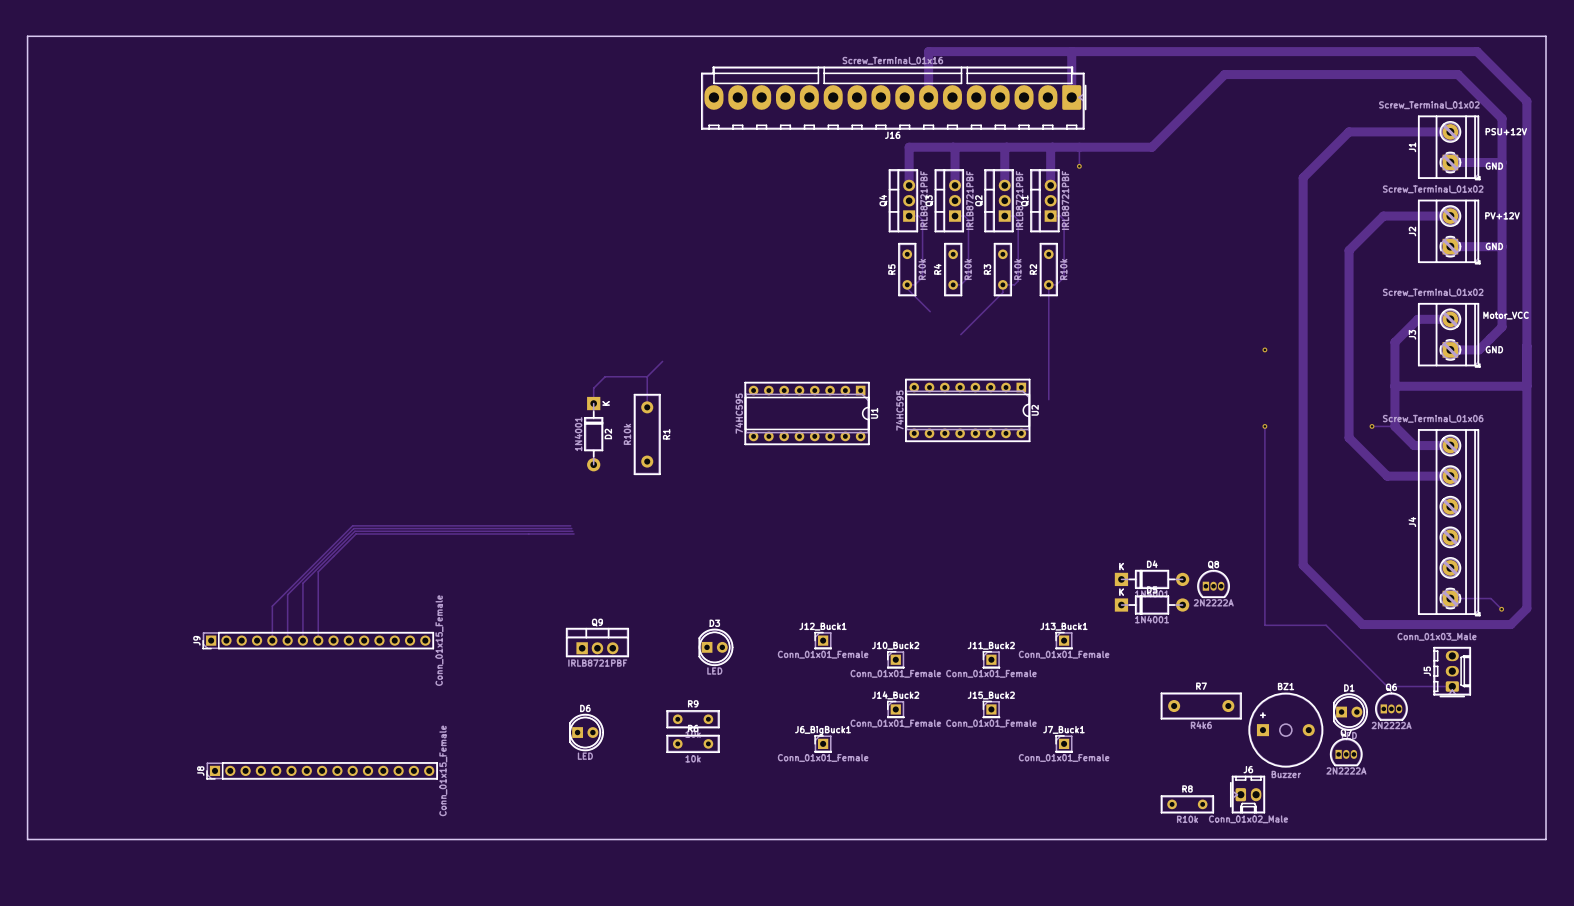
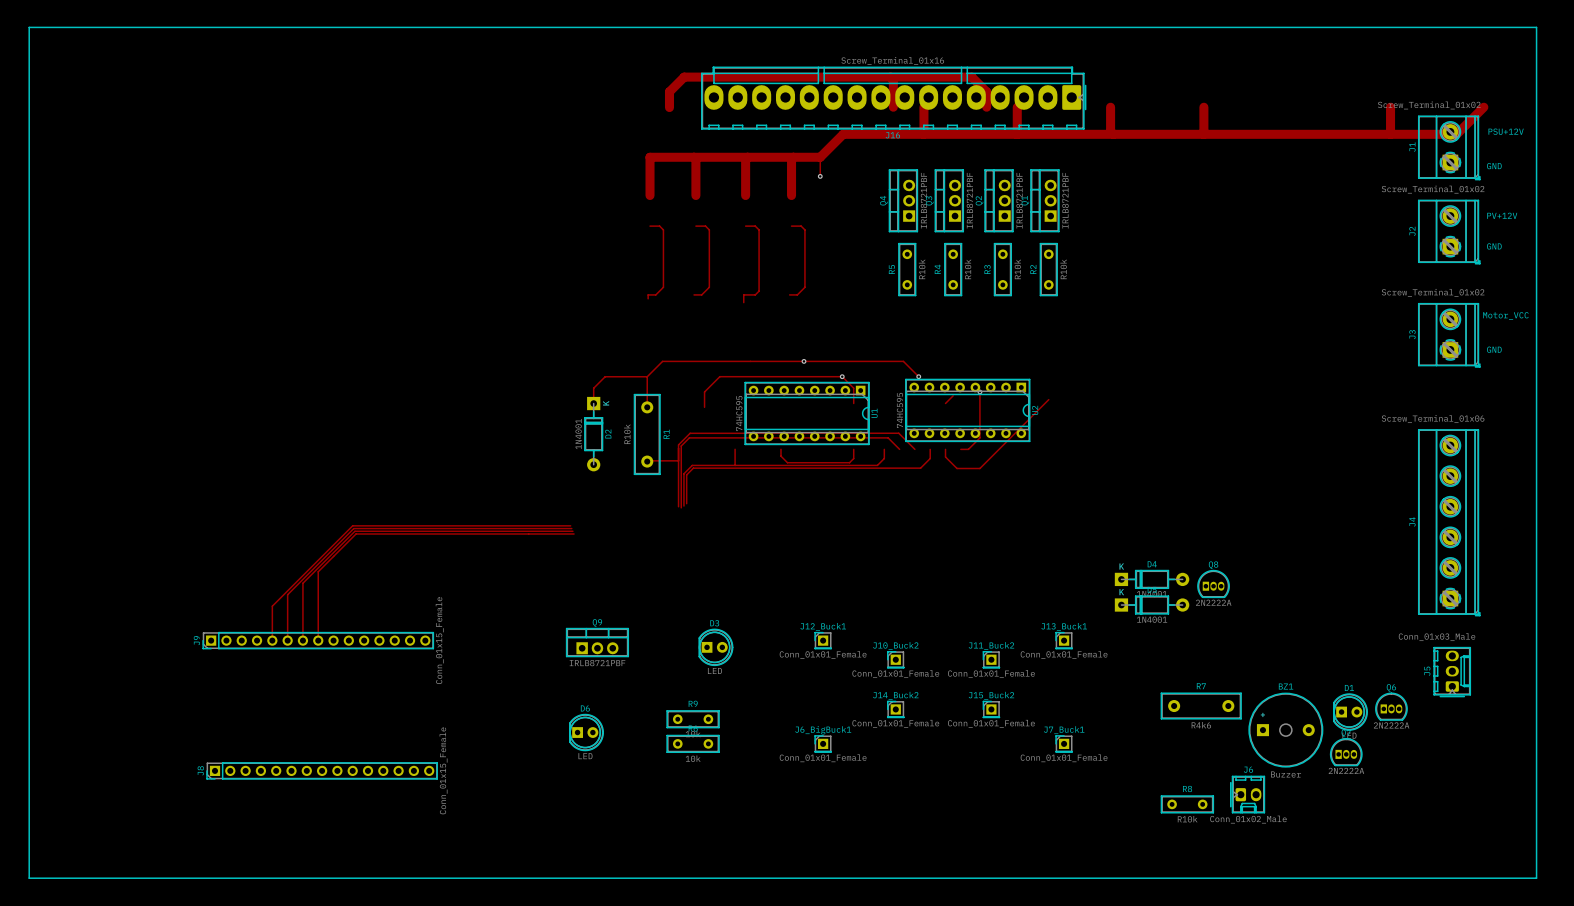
line: none -> (29, 27) (1536, 27) (1536, 878) (29, 878) (29, 27)
board edge: (27, 36) (1546, 36) (1546, 839) (27, 839) (27, 36) -> none
track: (1071, 51) (1071, 97) -> none
track: none -> (890, 77) (893, 79) (893, 107)
track: (928, 97) (928, 51) (1477, 51) (1526, 101) (1526, 608) (1510, 624) (1362, 624) (1303, 565) (1303, 177) (1349, 131) (1450, 131) -> none
track: none -> (923, 107) (923, 134)
track: none -> (986, 107) (986, 91) (971, 77) (684, 77) (669, 91) (669, 107)
track: none -> (1017, 107) (1017, 134)
track: none -> (1110, 107) (1110, 131) (1113, 134)
track: none -> (1203, 107) (1203, 134)
track: none -> (1390, 107) (1390, 134)
track: none -> (1483, 107) (1456, 134) (843, 134) (820, 157)
track: (953, 147) (955, 149) (955, 185) -> none
track: (1006, 147) (1004, 149) (1004, 185) -> none
track: (1052, 147) (1050, 149) (1050, 185) -> none
track: (1079, 147) (1079, 166) -> none
track: none -> (694, 157) (695, 159) (695, 195)
track: none -> (747, 157) (745, 159) (745, 195)
track: none -> (793, 157) (791, 159) (791, 195)
track: none -> (820, 157) (650, 157) (650, 195)
track: none -> (820, 157) (820, 176)
track: (1450, 162) (1502, 162) -> none
via: (1079, 166) -> none
via: none -> (820, 176)
track: (909, 185) (909, 147) (1152, 147) (1224, 74) (1458, 74) (1502, 118) (1502, 326) (1479, 349) (1450, 349) -> none
track: (909, 216) (918, 216) (922, 219) (922, 277) (914, 284) (907, 284) (907, 288) (930, 311) -> none
track: (955, 216) (964, 216) (968, 219) (968, 277) (960, 284) (953, 284) -> none
track: (1004, 216) (1014, 216) (1018, 219) (1018, 281) (1014, 284) (1002, 284) (1002, 292) (960, 334) -> none
track: (1050, 216) (1060, 216) (1064, 219) (1064, 277) (1056, 284) (1048, 284) (1048, 399) -> (945, 449) (945, 457) (956, 468) (979, 468) (1048, 399)
track: (1450, 216) (1383, 216) (1349, 250) (1349, 437) (1387, 476) (1450, 476) -> none
track: none -> (650, 226) (659, 226) (663, 229) (663, 287) (655, 294) (648, 294) (648, 298)
track: none -> (695, 226) (705, 226) (709, 229) (709, 287) (701, 294) (694, 294)
track: none -> (745, 226) (755, 226) (759, 229) (759, 291) (755, 294) (743, 294) (743, 302)
track: none -> (791, 226) (801, 226) (804, 229) (804, 287) (797, 294) (789, 294)
track: (1450, 246) (1502, 246) -> none
track: (1450, 319) (1417, 319) (1394, 342) (1394, 426) -> none
via: (1264, 349) -> none
track: none -> (662, 361) (903, 361) (918, 376)
via: none -> (803, 361)
via: none -> (842, 376)
via: none -> (918, 376)
track: (1394, 386) (1526, 386) -> none
track: none -> (979, 392) (979, 437) (968, 449) (960, 449)
via: none -> (979, 392)
track: none -> (953, 395) (945, 403)
track: none -> (853, 403) (853, 388) (842, 376) (719, 376) (704, 392) (704, 407)
track: (1264, 426) (1264, 625) (1326, 625) (1387, 686) (1452, 686) -> none
via: (1264, 426) -> none
track: (1371, 426) (1394, 426) -> none
via: (1371, 426) -> none
track: (1394, 426) (1414, 445) (1450, 445) -> none
track: none -> (765, 433) (898, 433) (914, 449)
track: none -> (765, 433) (690, 433) (678, 444) (678, 506)
track: none -> (750, 437) (689, 437) (681, 446) (681, 507)
track: none -> (750, 437) (888, 437) (899, 449)
track: none -> (735, 449) (735, 465)
track: none -> (780, 449) (780, 456) (787, 462) (849, 462) (853, 458) (853, 449)
track: none -> (884, 449) (884, 458) (877, 465) (692, 465) (683, 473) (683, 506)
track: none -> (930, 449) (930, 458) (920, 468) (693, 468) (686, 474) (686, 503)
track: none -> (647, 460) (678, 460)
track: (1450, 598) (1490, 598) (1501, 609) -> none
via: (1501, 609) -> none

